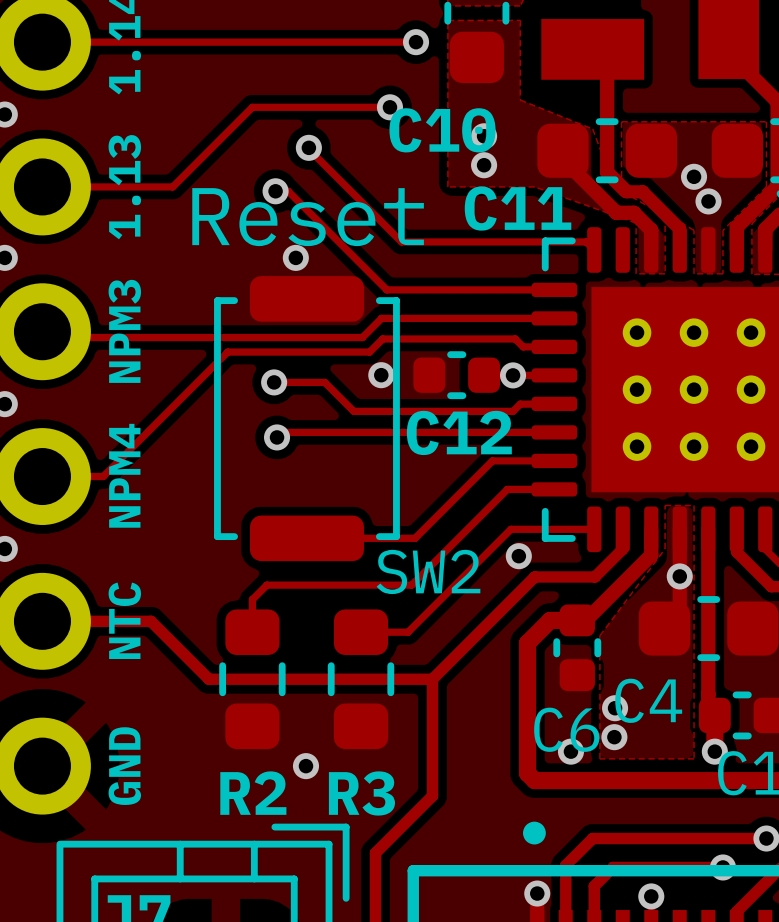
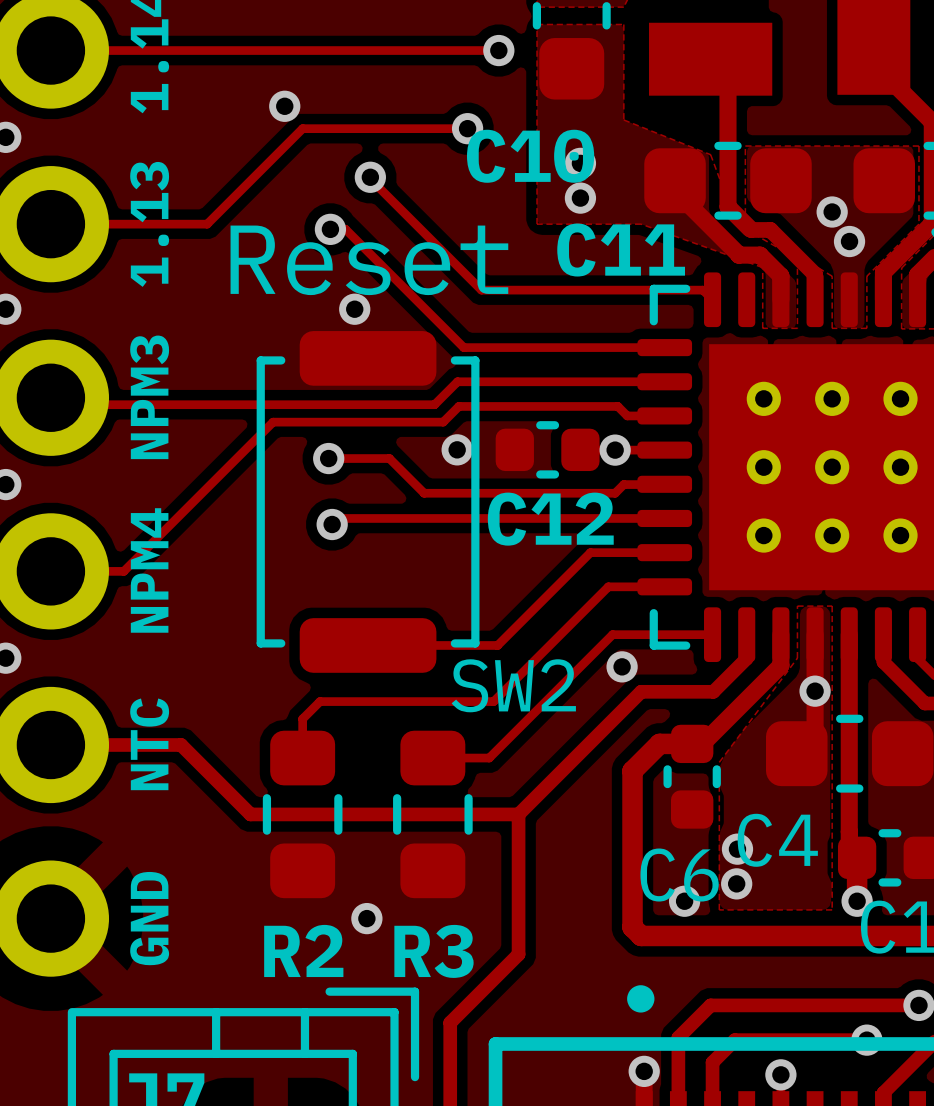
via: none -> (284, 106)

